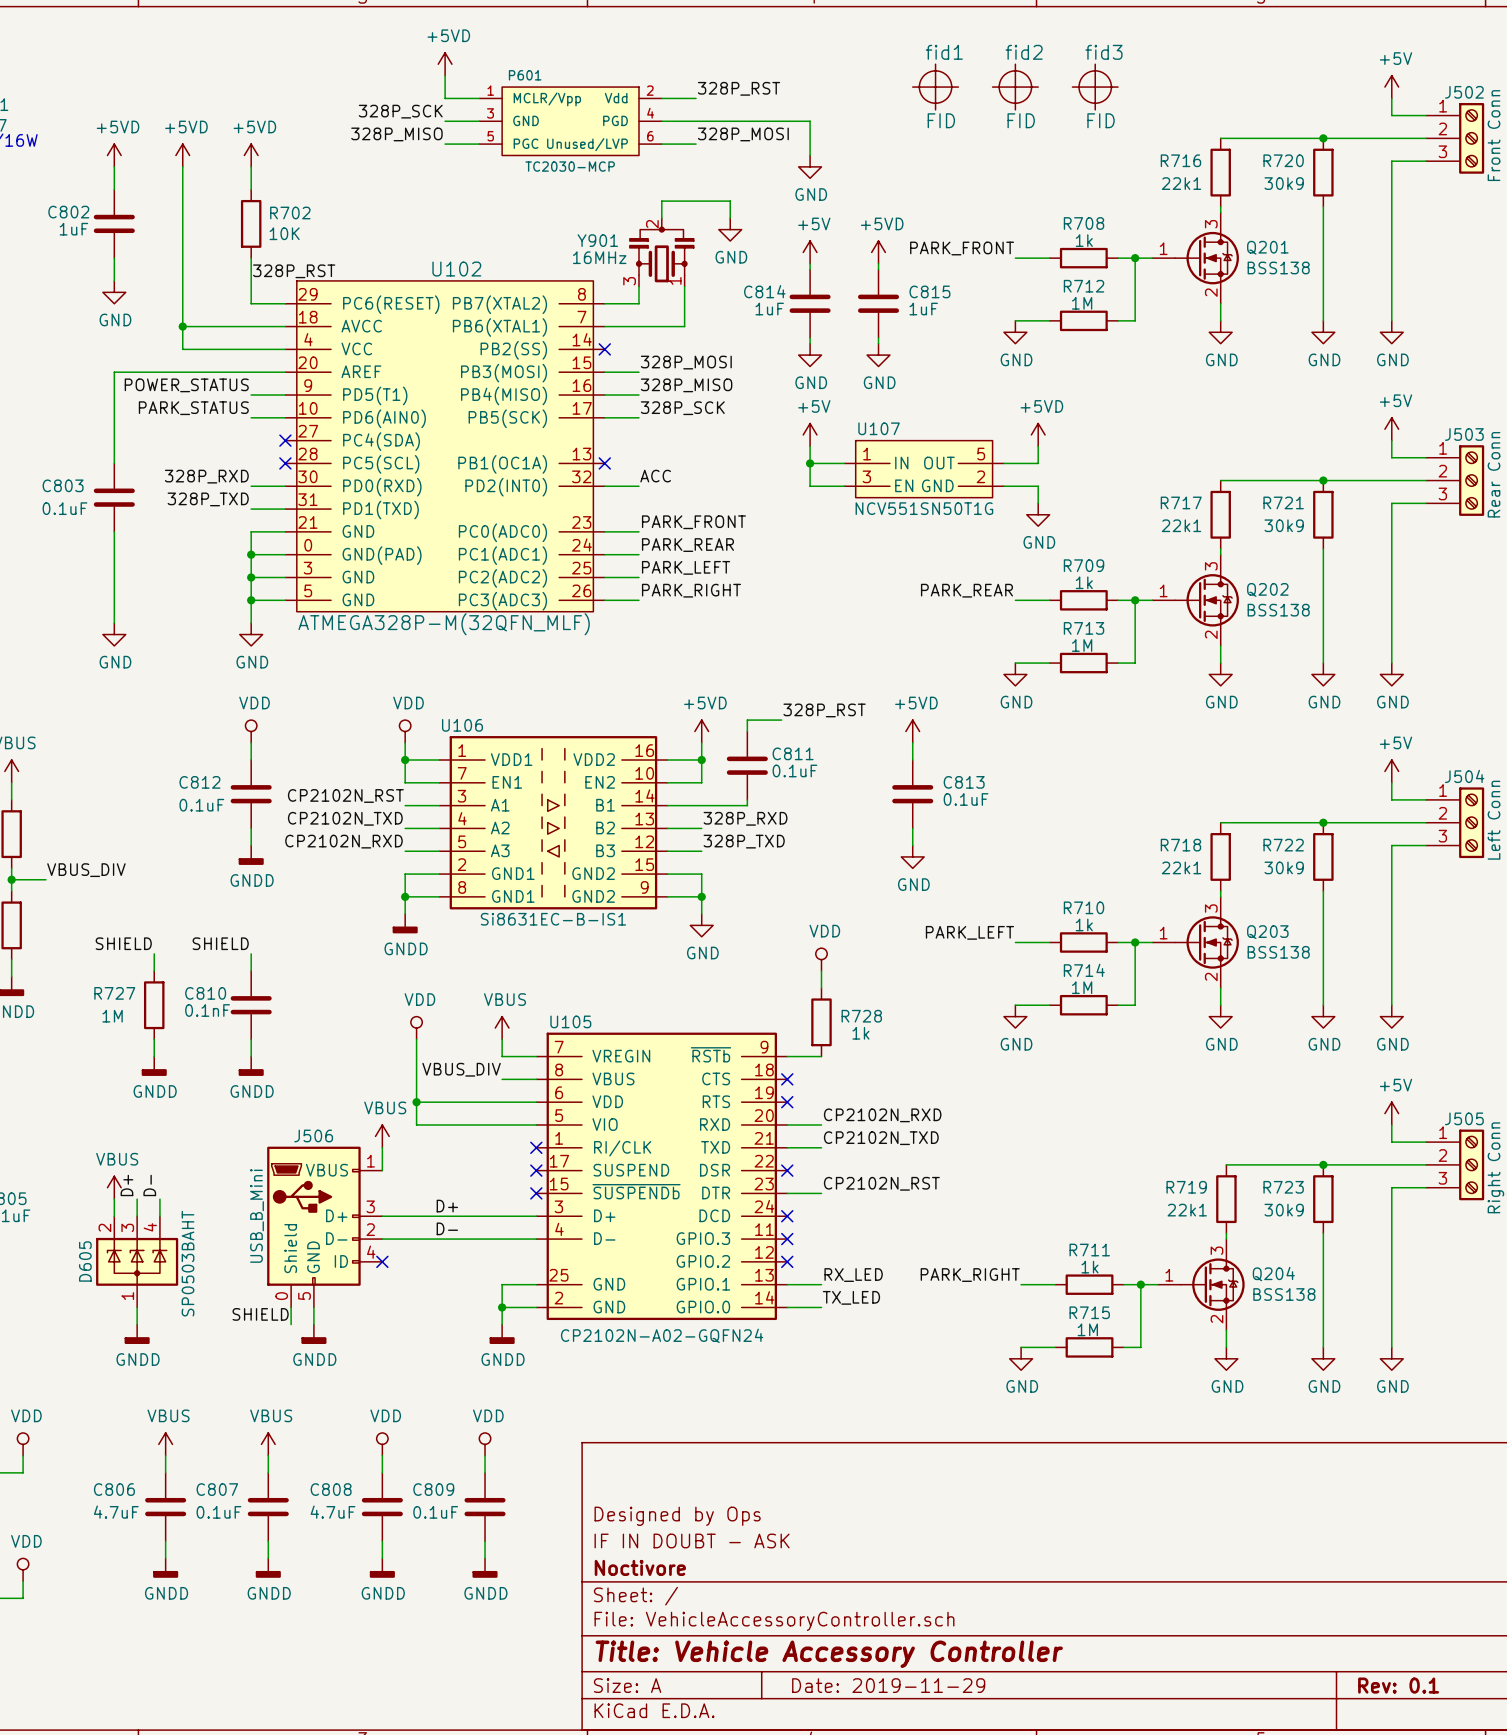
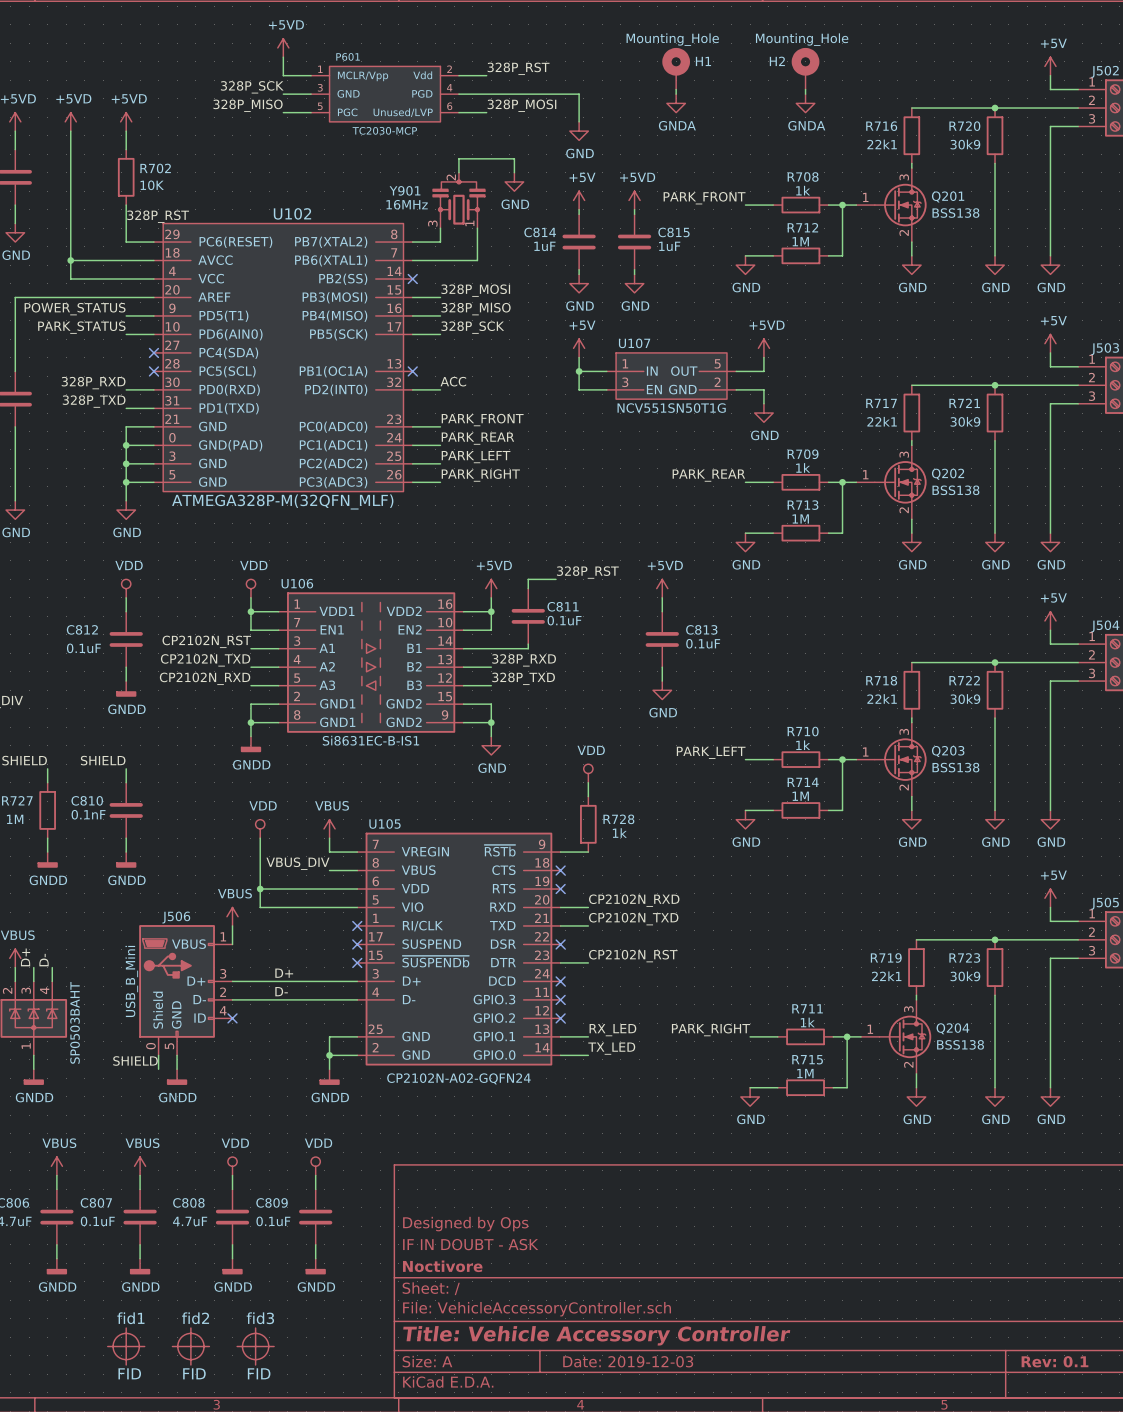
fid1 position: (935, 87) -> (126, 1346)
fid2 position: (1015, 87) -> (190, 1346)
fid3 position: (1095, 87) -> (255, 1346)
H1: none -> Mounting_Hole (676, 68)
H2: none -> Mounting_Hole (805, 68)
wire: none -> (676, 89) (676, 94)
wire: none -> (805, 89) (805, 94)
power symbol: none -> GNDA (676, 103)
power symbol: none -> GNDA (805, 103)
title block: Date: 2019-11-29 (888, 1685) -> Date: 2019-12-03 (628, 1361)

